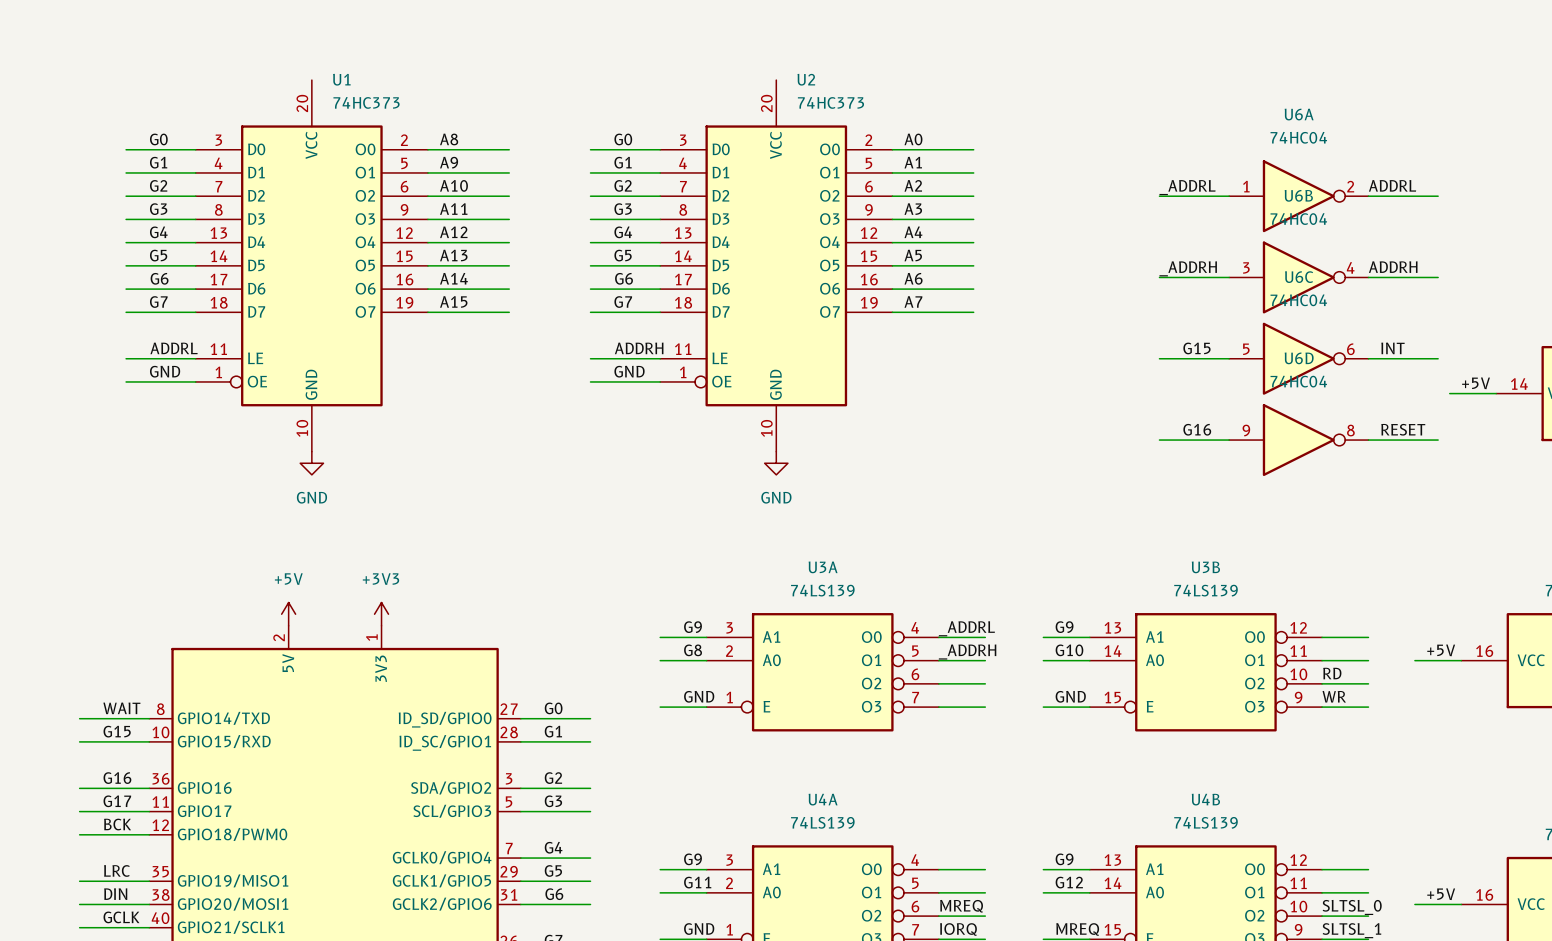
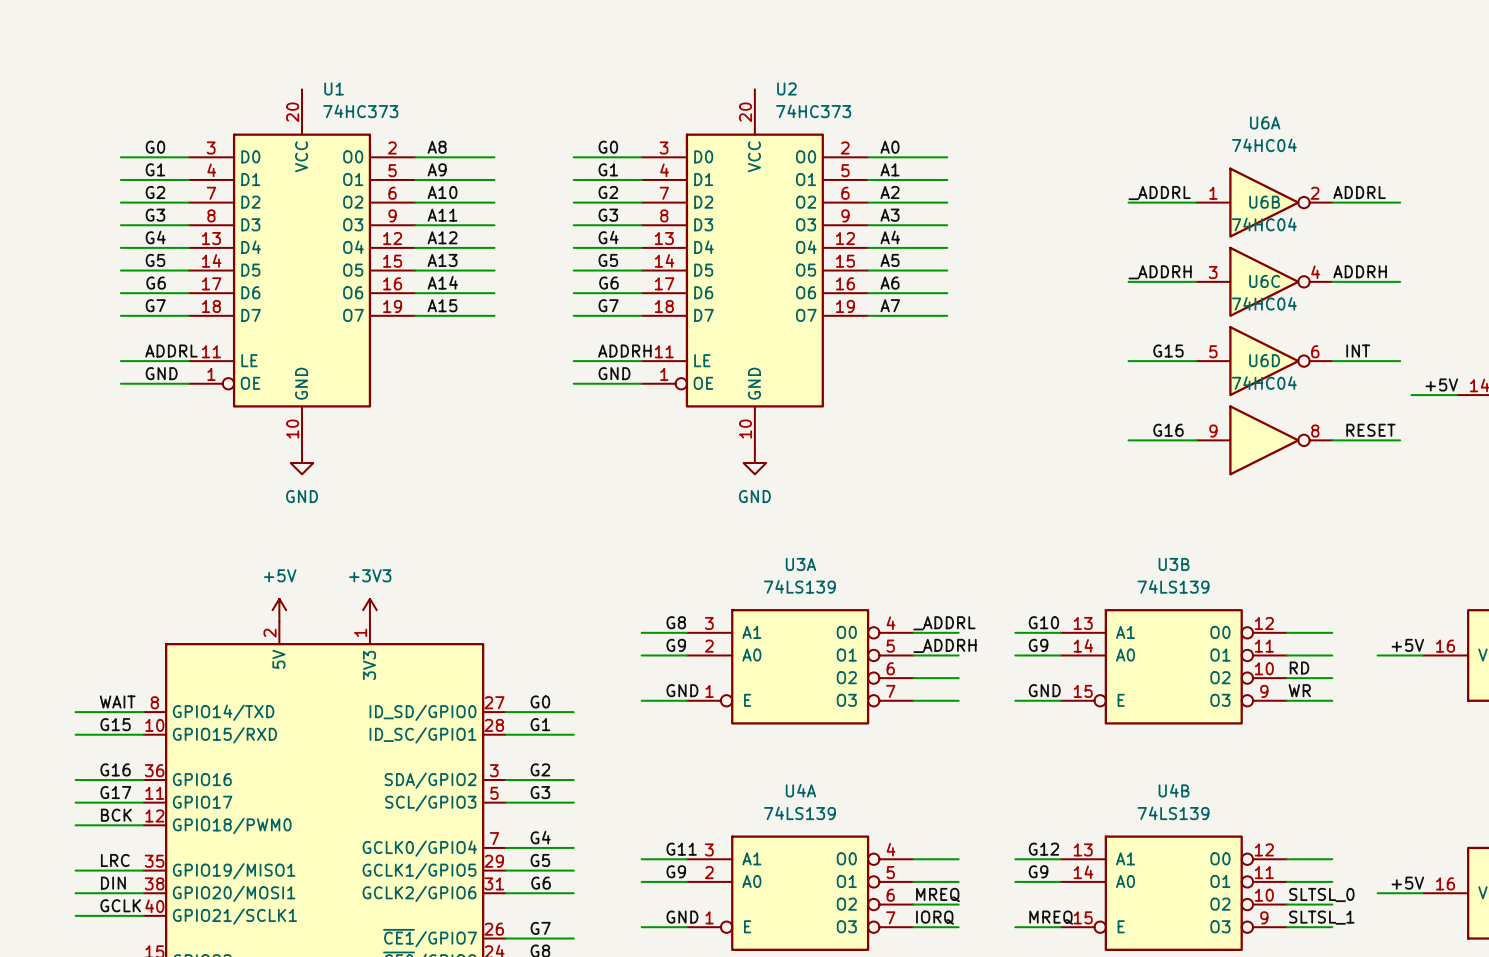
label: G9 (693, 627) -> G8 (676, 622)
label: G9 (1064, 627) -> G10 (1043, 622)
label: G8 (693, 650) -> G9 (676, 645)
label: G10 (1069, 650) -> G9 (1038, 645)
label: G9 (693, 859) -> G11 (681, 849)
label: G9 (1064, 859) -> G12 (1043, 849)
label: G11 (697, 882) -> G9 (676, 871)
label: G12 (1069, 882) -> G9 (1038, 871)

